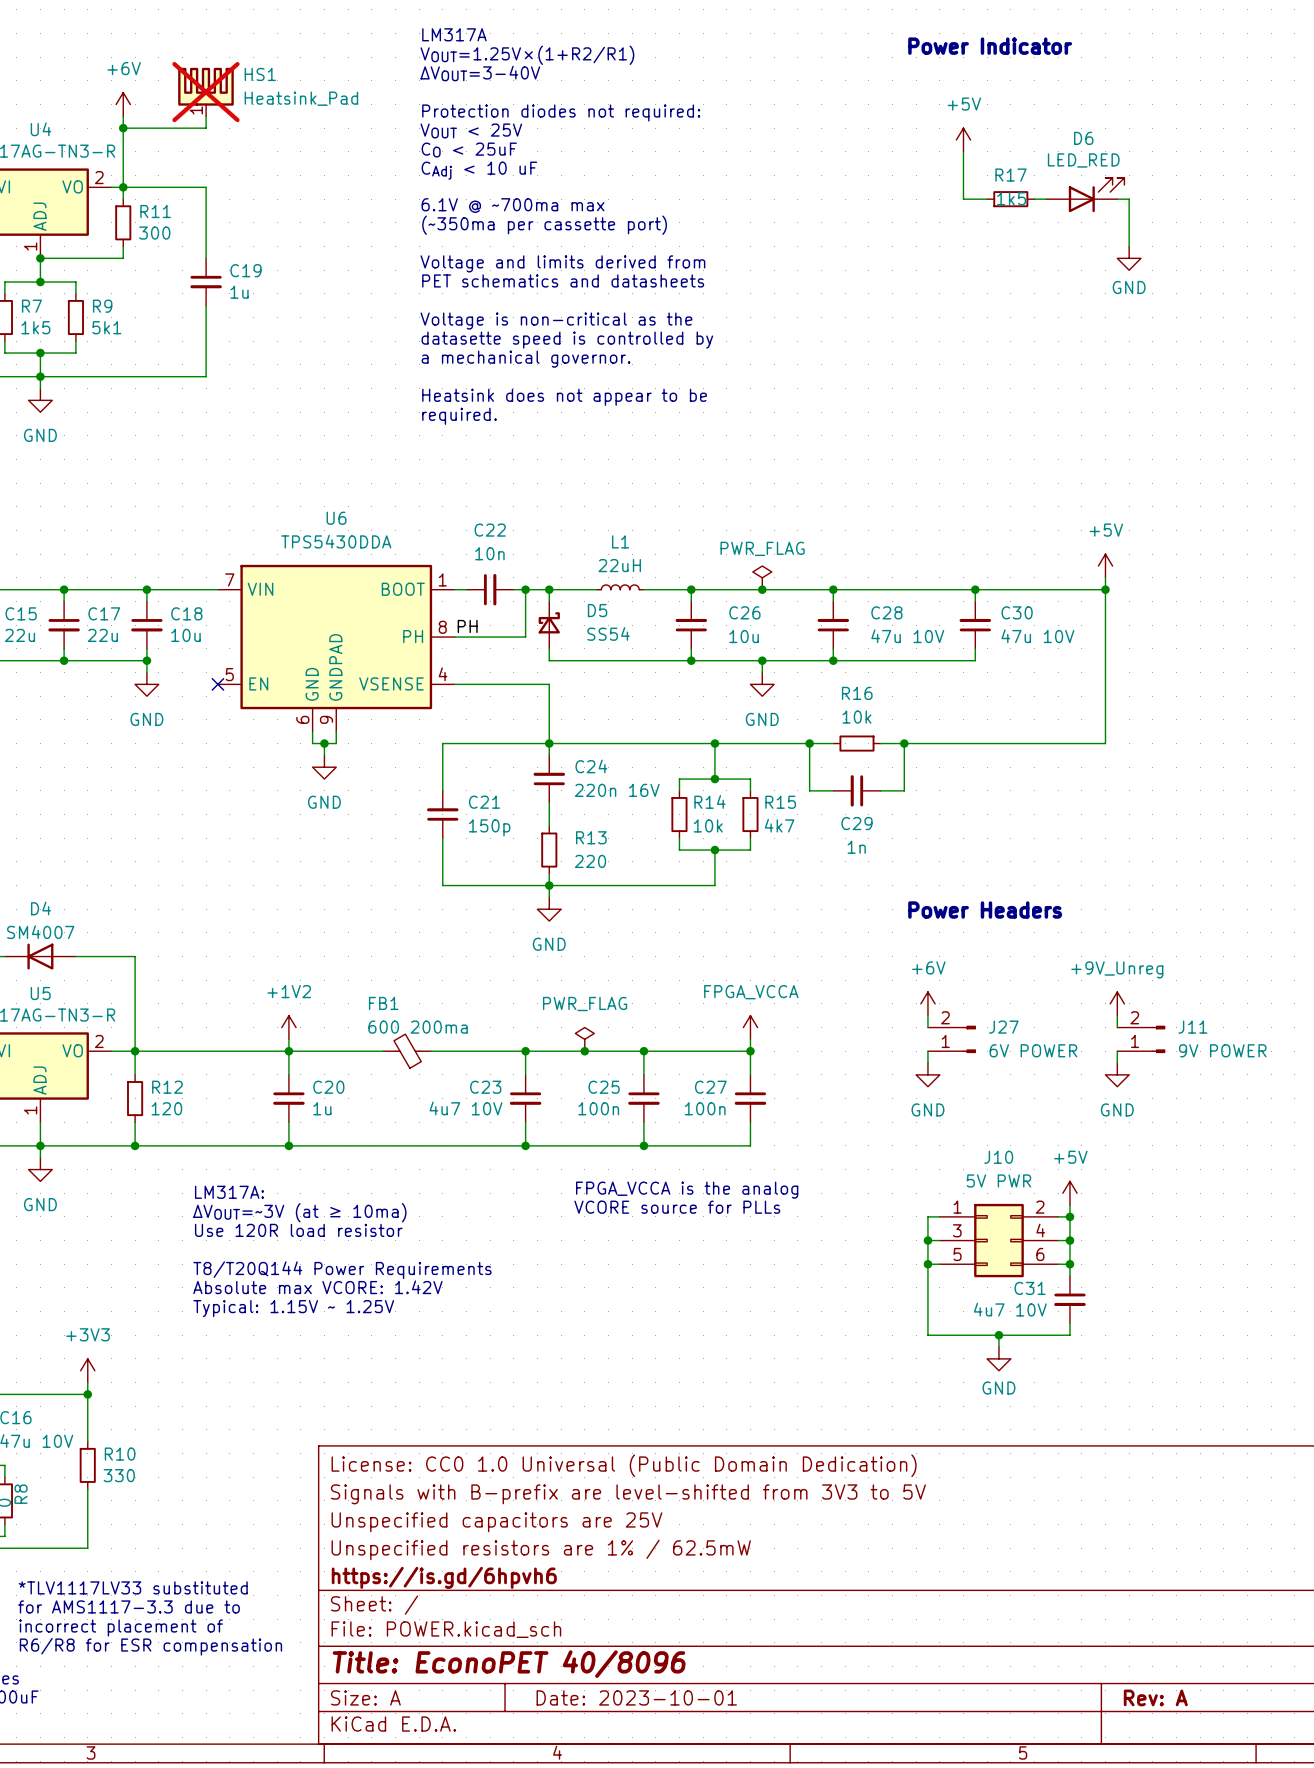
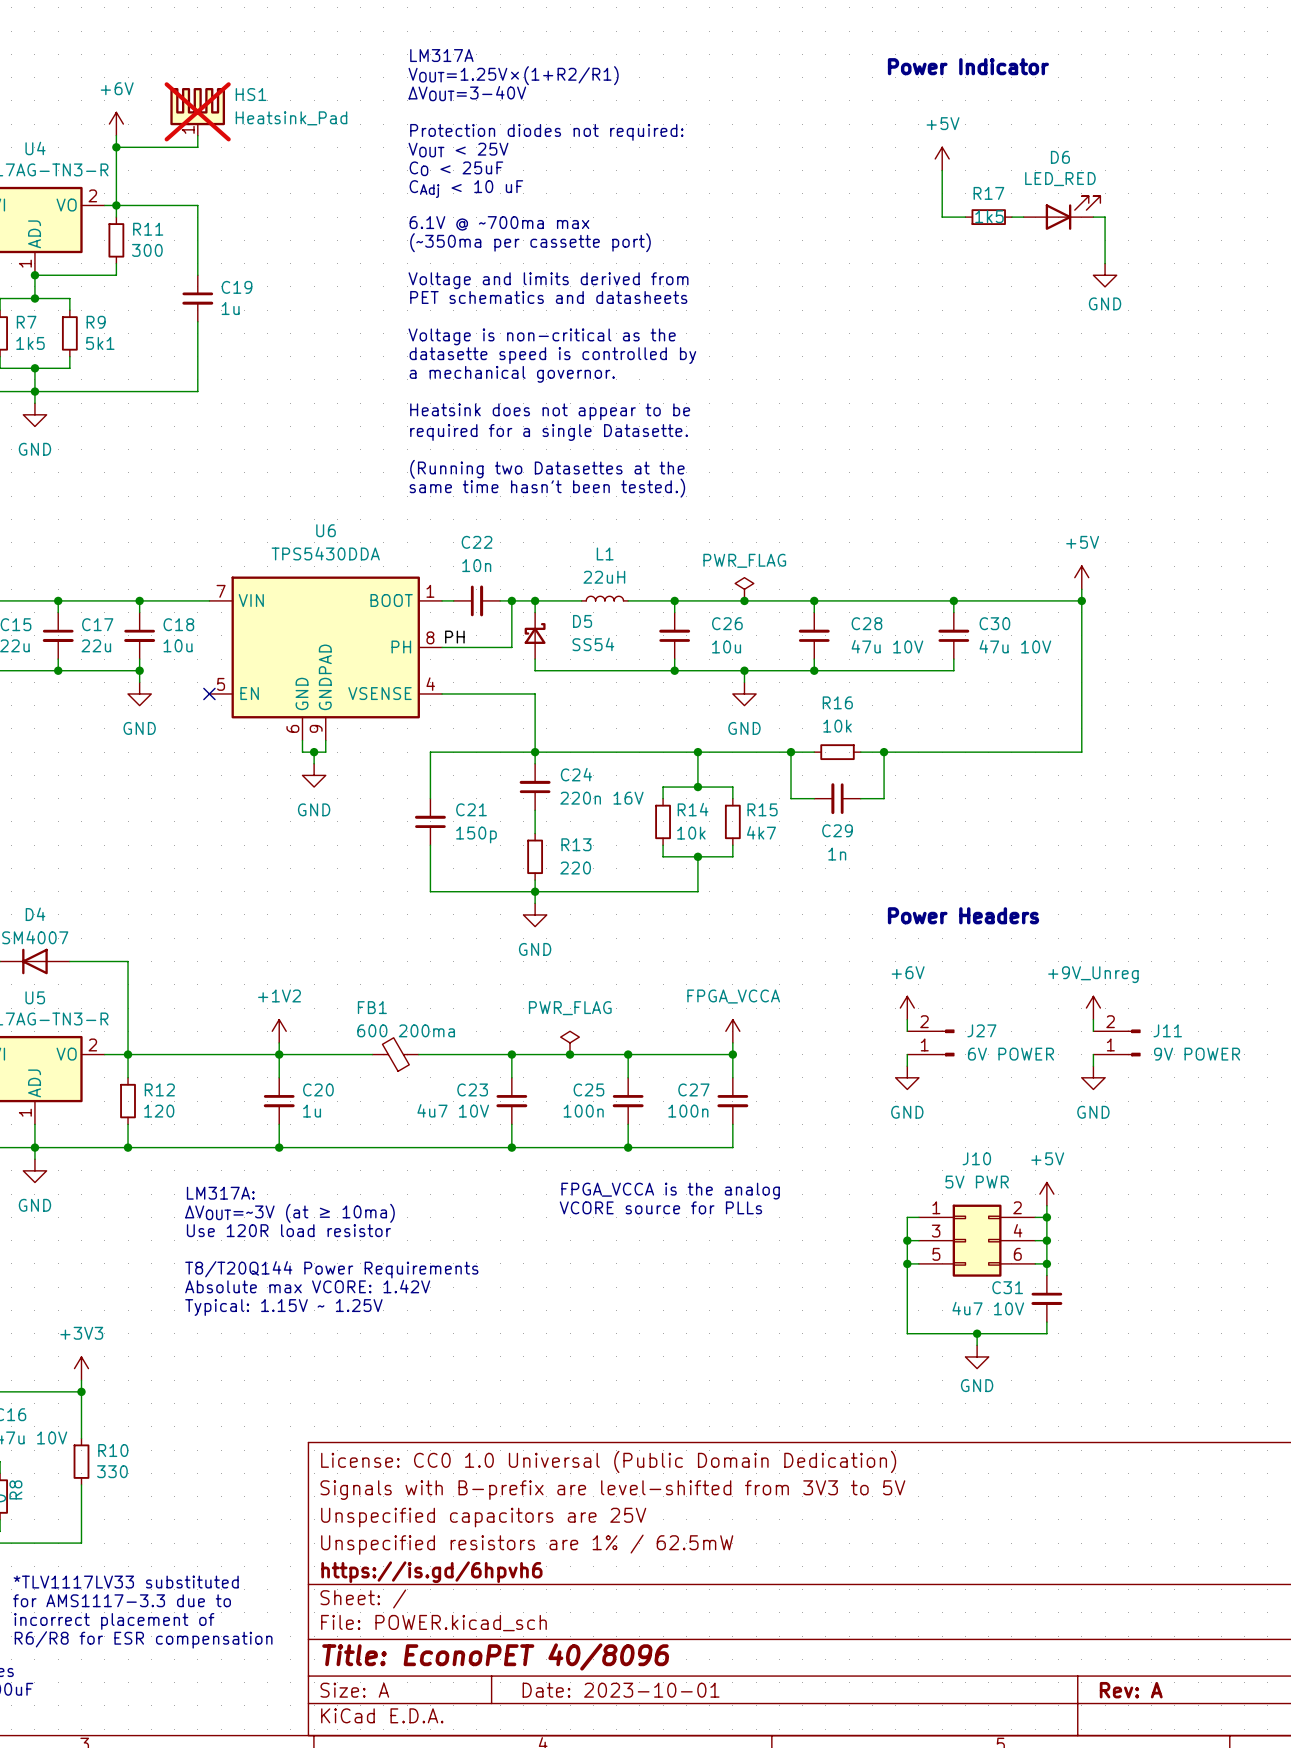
text: required. (459, 416) -> required for a single Datasette. (549, 432)
text: none -> (Running two Datasettes at the (547, 469)
text: none -> same time hasn't been tested.) (547, 488)

